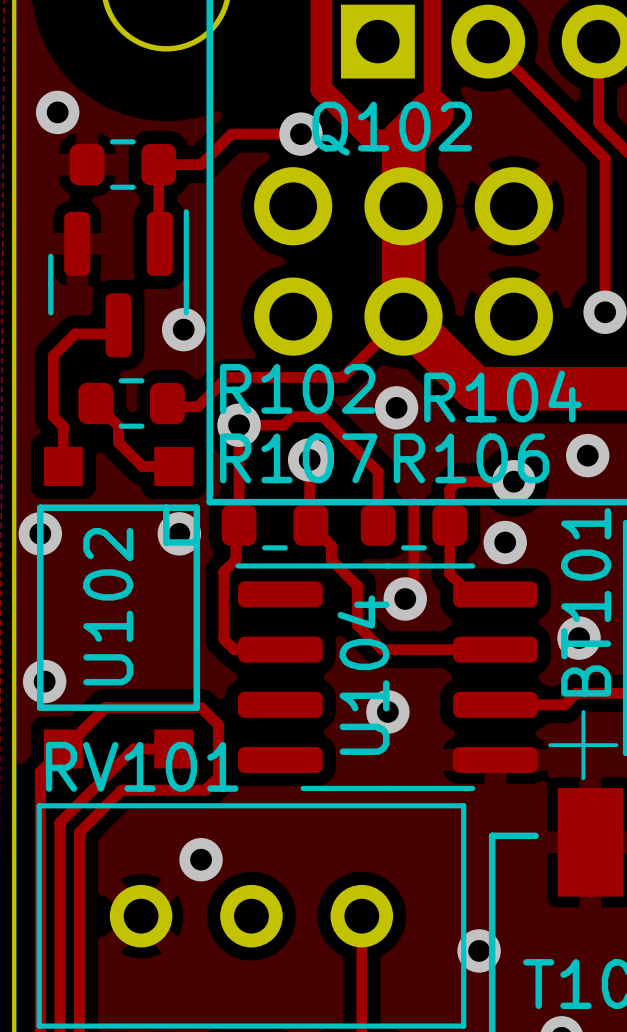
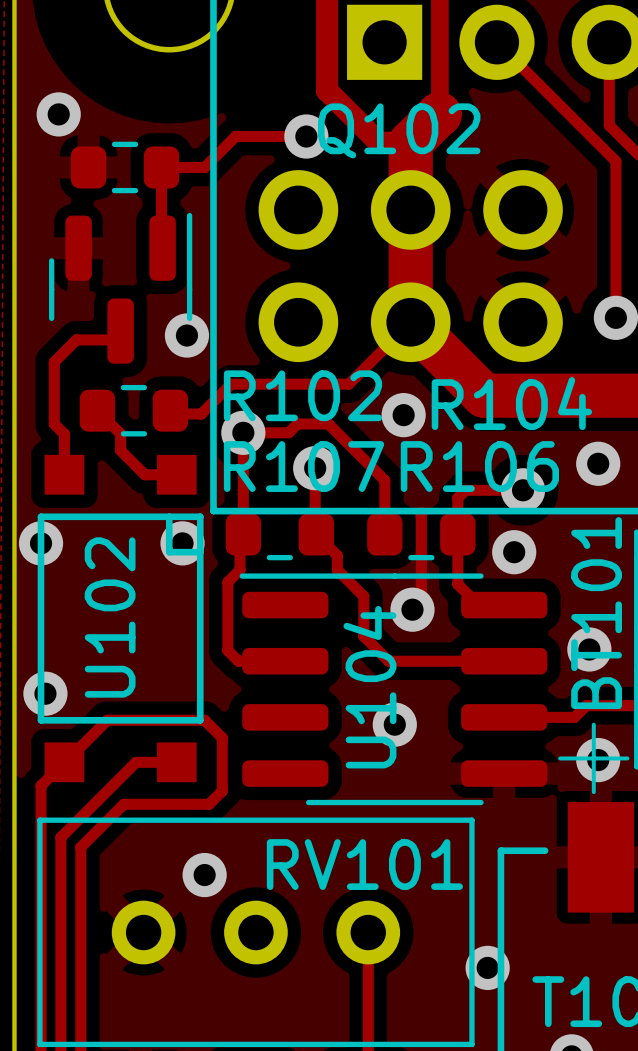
via: none -> (598, 760)
RV101 name position: RV101 (142, 766) -> RV101 (364, 864)

